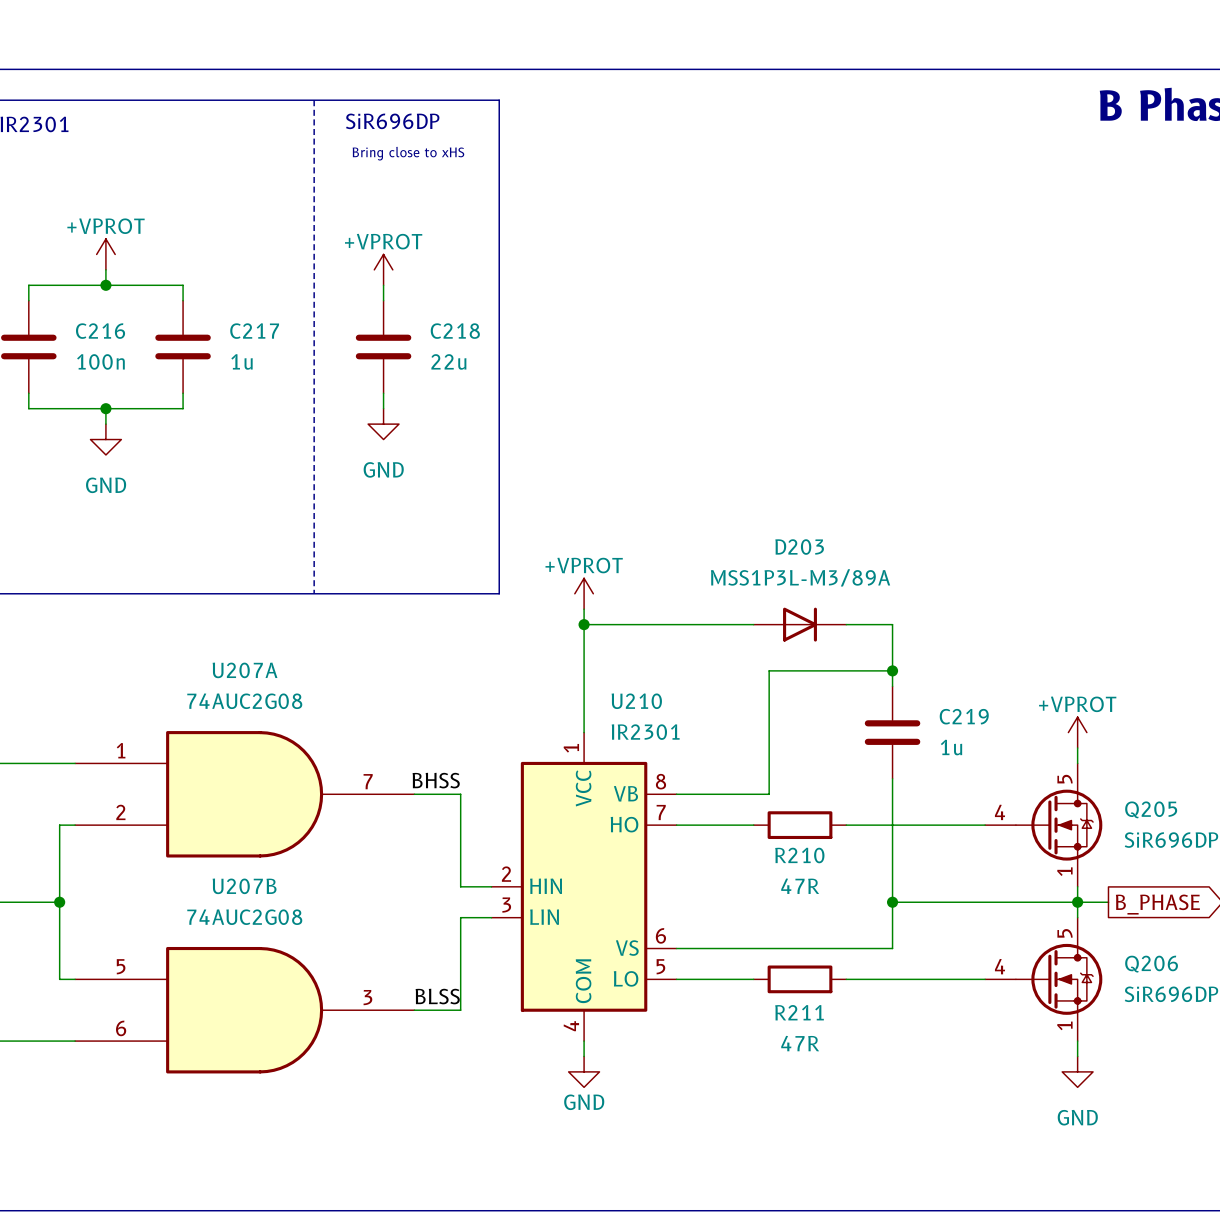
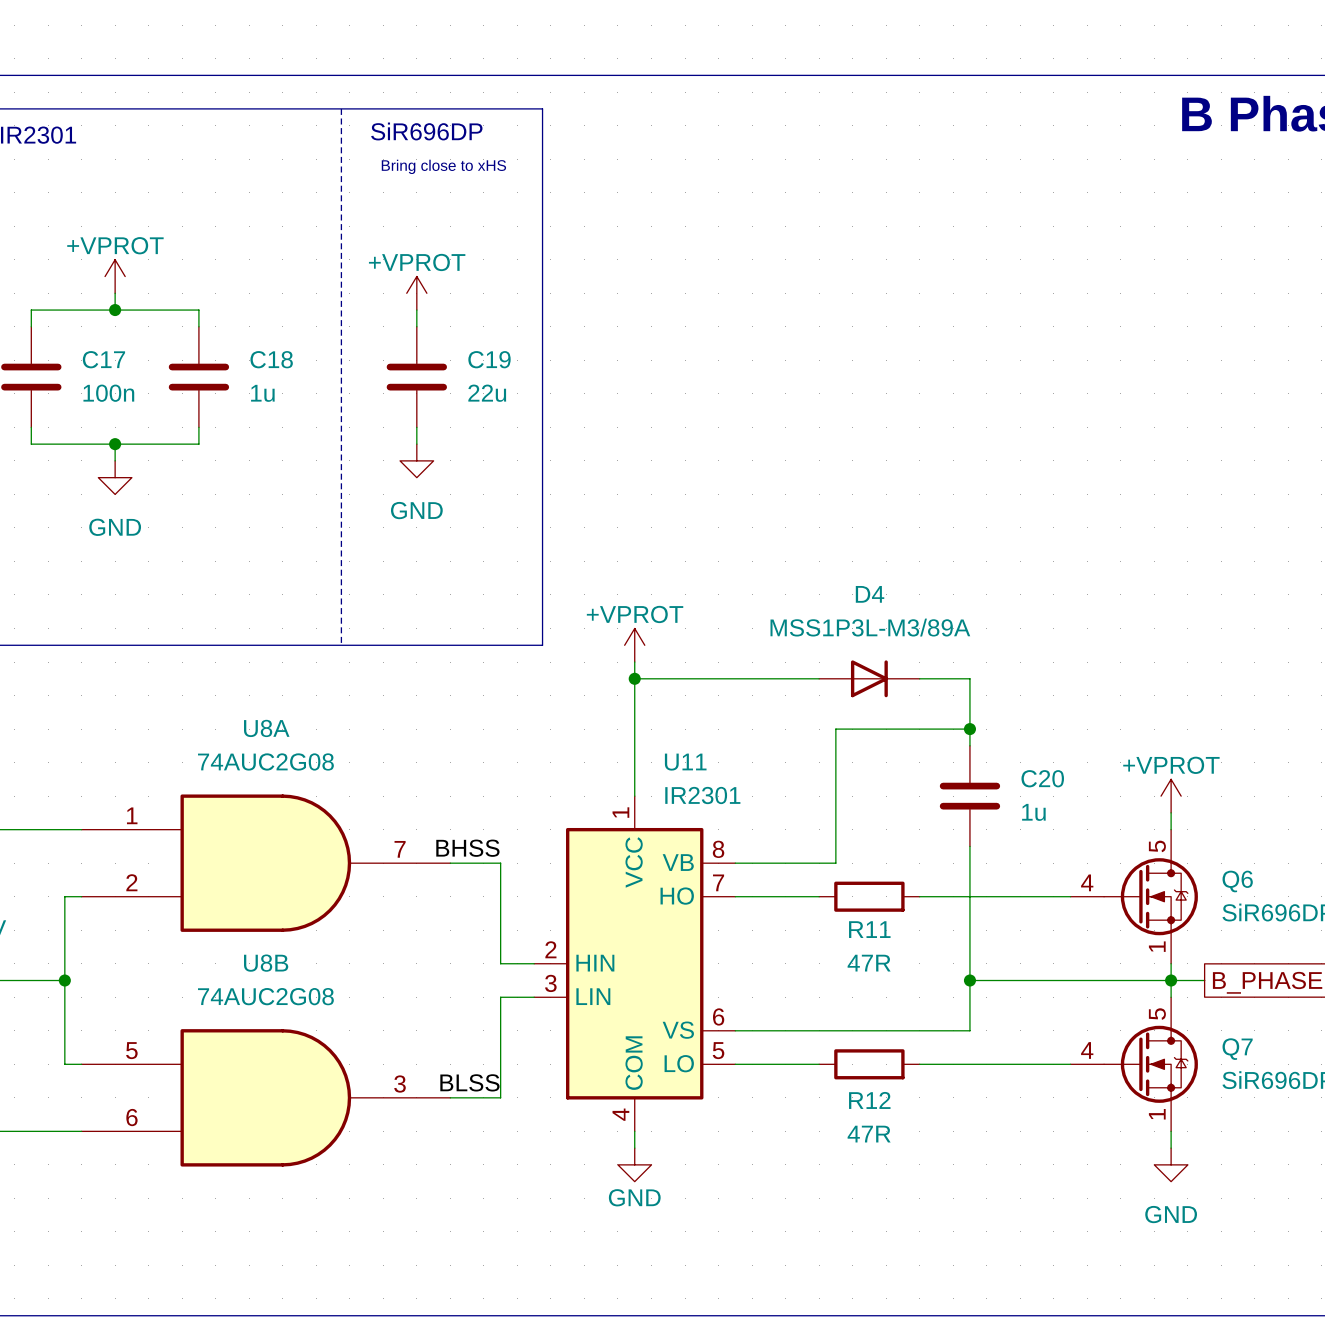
C216 name: C216 (100, 331) -> C17 (103, 359)
C217 name: C217 (254, 331) -> C18 (271, 359)
C218 name: C218 (455, 331) -> C19 (489, 359)
D203 name: D203 (799, 547) -> D4 (870, 594)
U207A name: U207A (245, 670) -> U8A (266, 728)
U210 name: U210 (636, 701) -> U11 (685, 762)
C219 name: C219 (964, 716) -> C20 (1042, 778)
Q205 name: Q205 (1151, 809) -> Q6 (1237, 881)
R210 name: R210 (799, 855) -> R11 (869, 929)
U207B name: U207B (244, 886) -> U8B (266, 963)
Q206 name: Q206 (1151, 964) -> Q7 (1237, 1049)
R211 name: R211 (799, 1012) -> R12 (869, 1100)

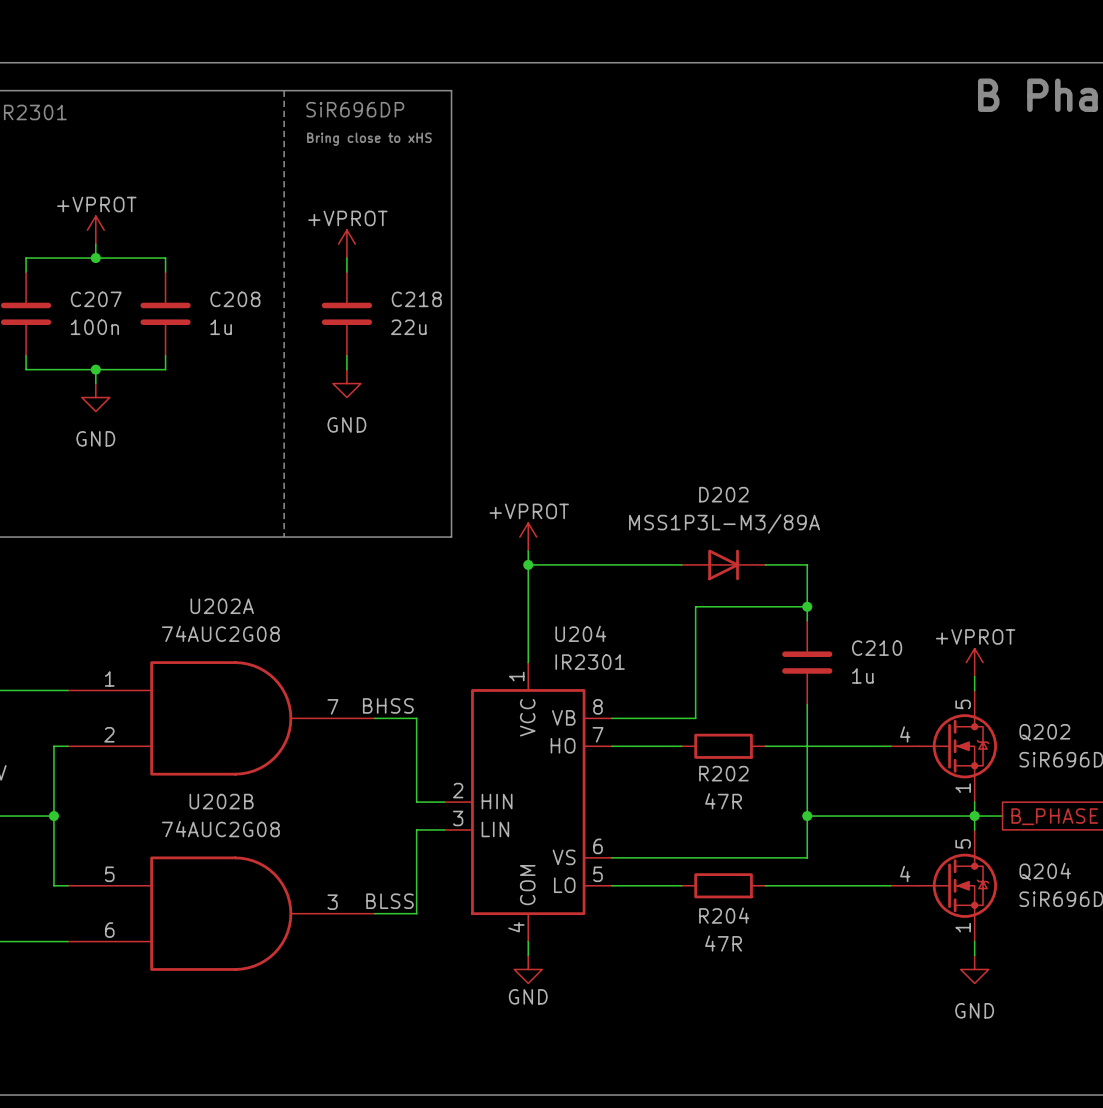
C17 name: C17 (103, 359) -> C207 (96, 299)
C18 name: C18 (271, 359) -> C208 (235, 299)
C19 name: C19 (489, 359) -> C218 (416, 299)
D4 name: D4 (870, 594) -> D202 (723, 494)
U8A name: U8A (266, 728) -> U202A (222, 606)
U11 name: U11 (685, 762) -> U204 (580, 633)
C20 name: C20 (1042, 778) -> C210 (877, 648)
Q6 name: Q6 (1237, 881) -> Q202 (1044, 732)
R11 name: R11 (869, 929) -> R202 (723, 773)
U8B name: U8B (266, 963) -> U202B (221, 801)
Q7 name: Q7 (1237, 1049) -> Q204 (1045, 871)
R12 name: R12 (869, 1100) -> R204 (724, 915)

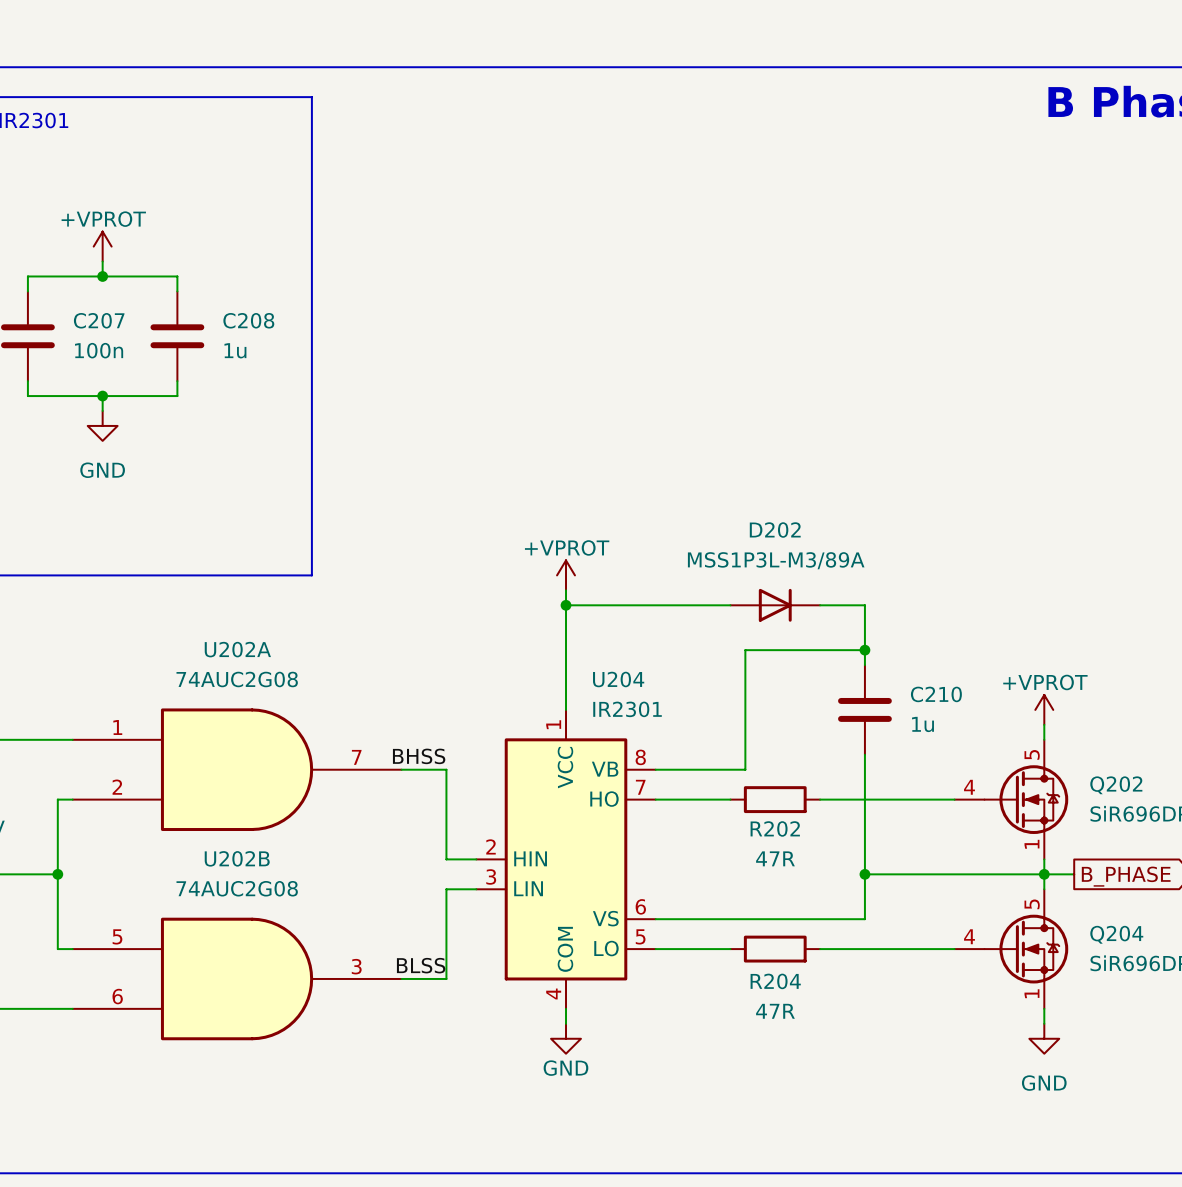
line: (284, 90) (284, 537) -> none
line: (291, 90) (451, 90) (451, 537) (291, 537) -> (311, 97) (311, 575)
text: SiR696DP (355, 109) -> none
text: Bring close to xHS (369, 139) -> none
power symbol: +VPROT (346, 244) -> none
wire: (346, 258) (346, 271) -> none
C218: 22u (346, 313) -> none
wire: (346, 355) (346, 369) -> none
power symbol: GND (346, 383) -> none

